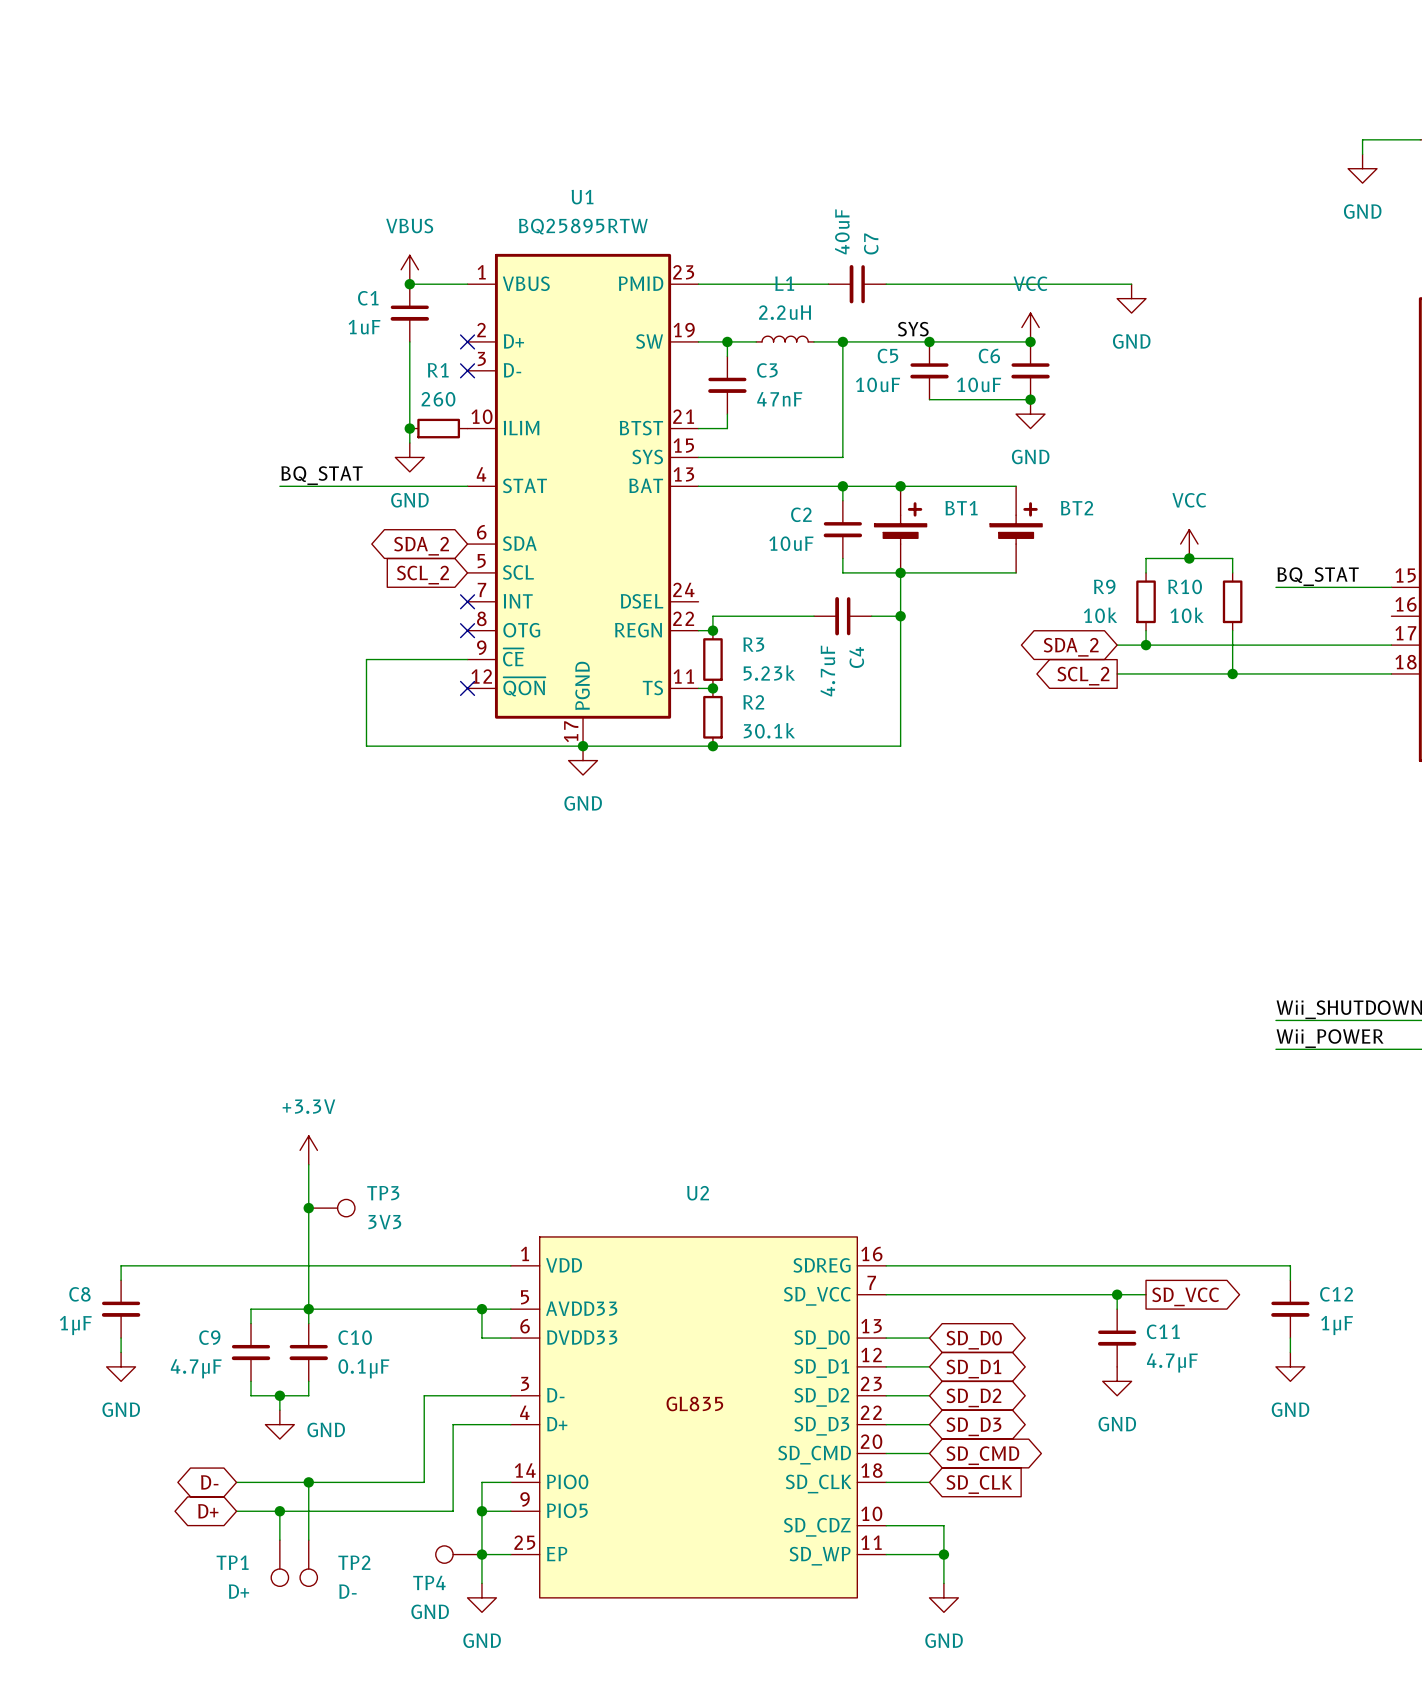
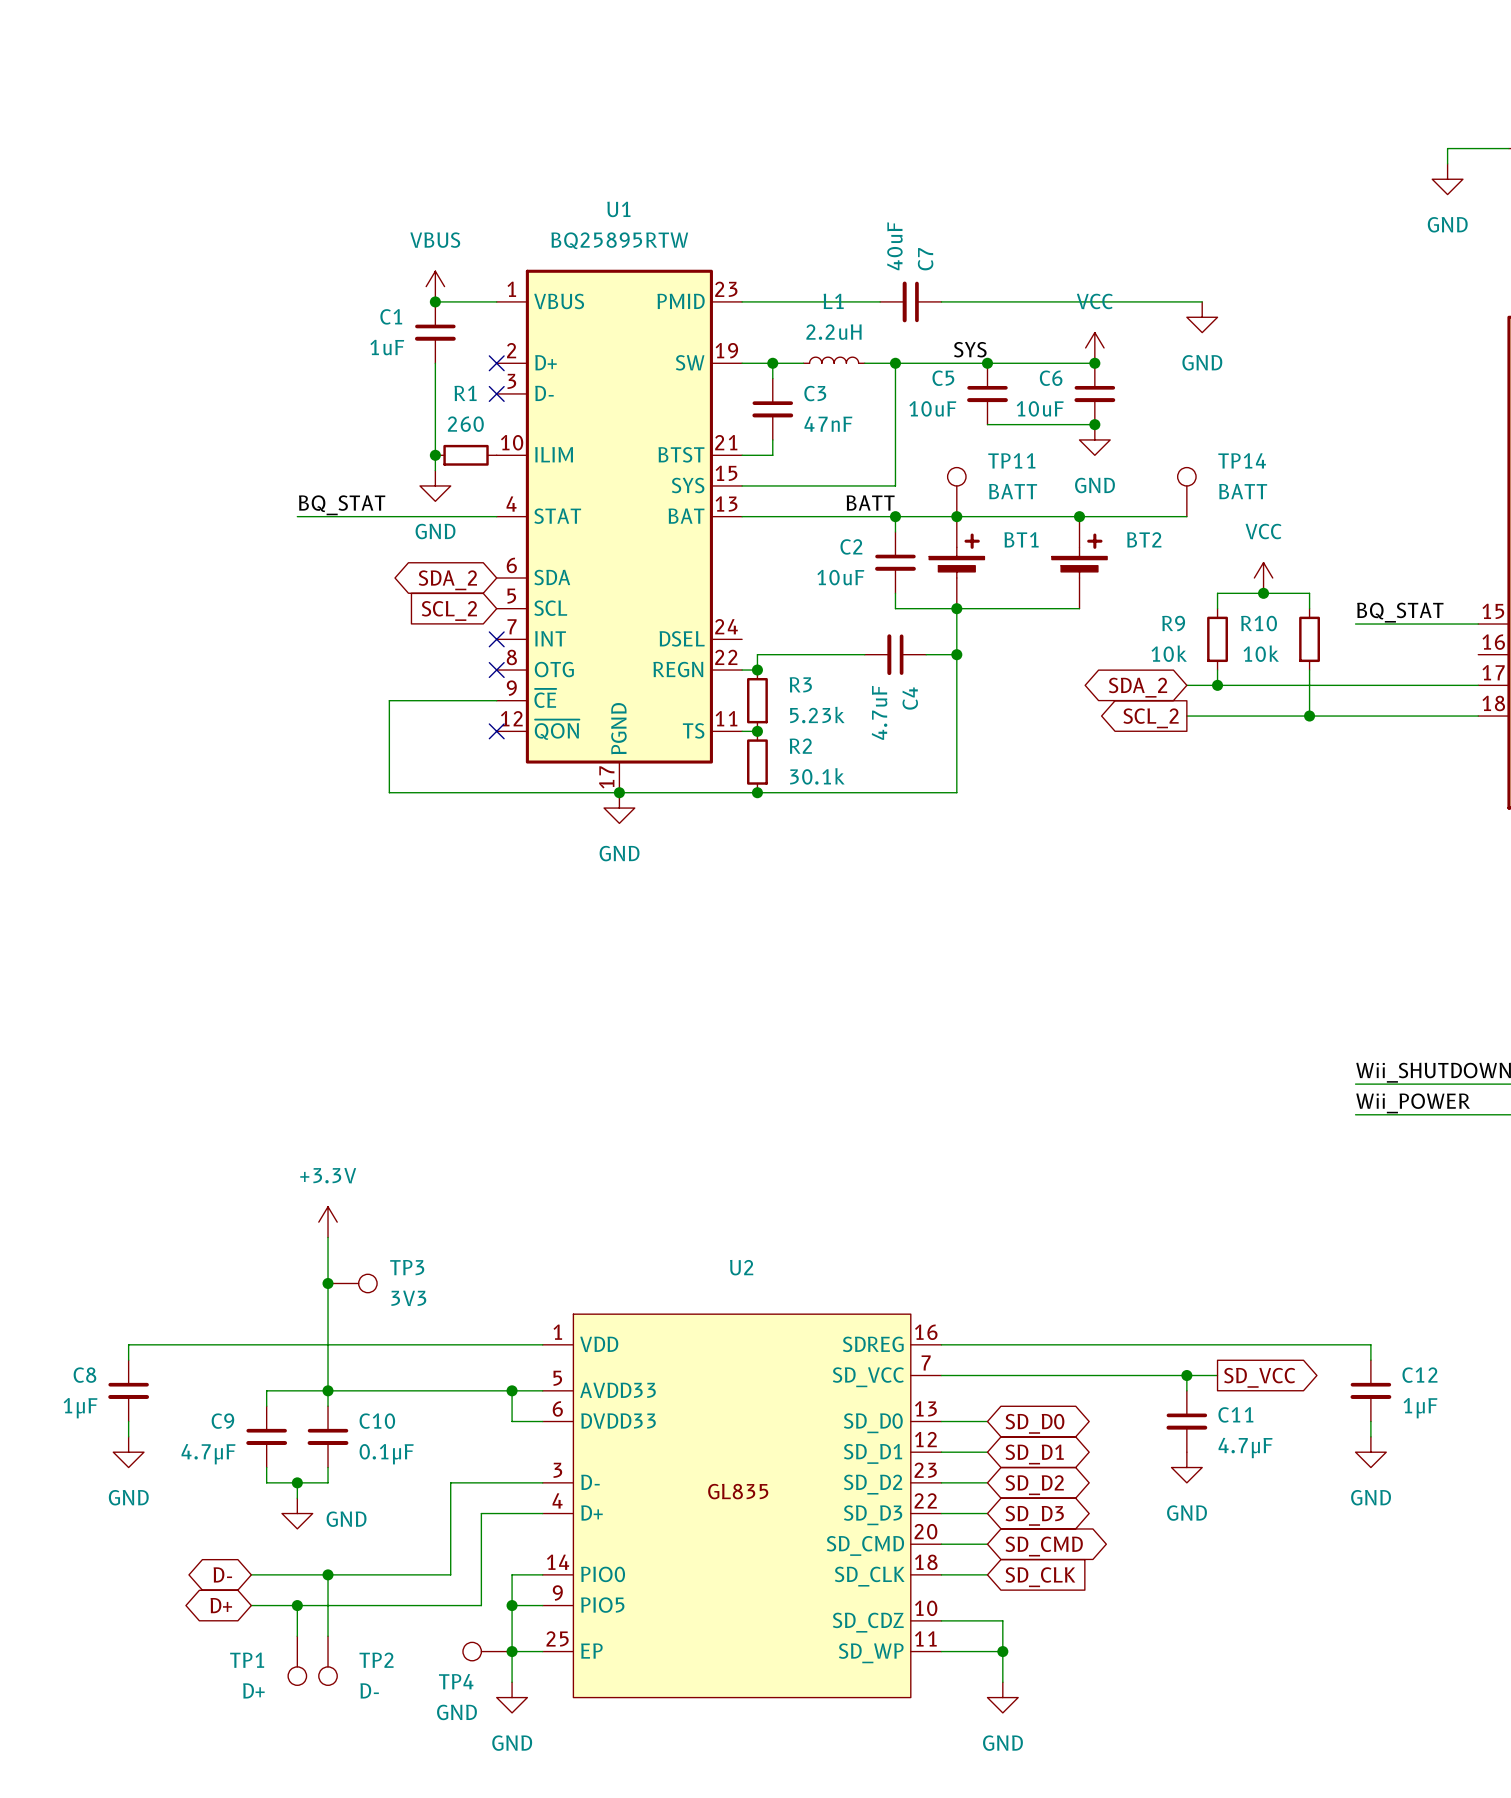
TP11: none -> BATT (956, 492)
TP14: none -> BATT (1186, 492)
label: none -> BATT (870, 502)
wire: none -> (1079, 516) (1186, 516)
junction: none -> (1079, 516)

